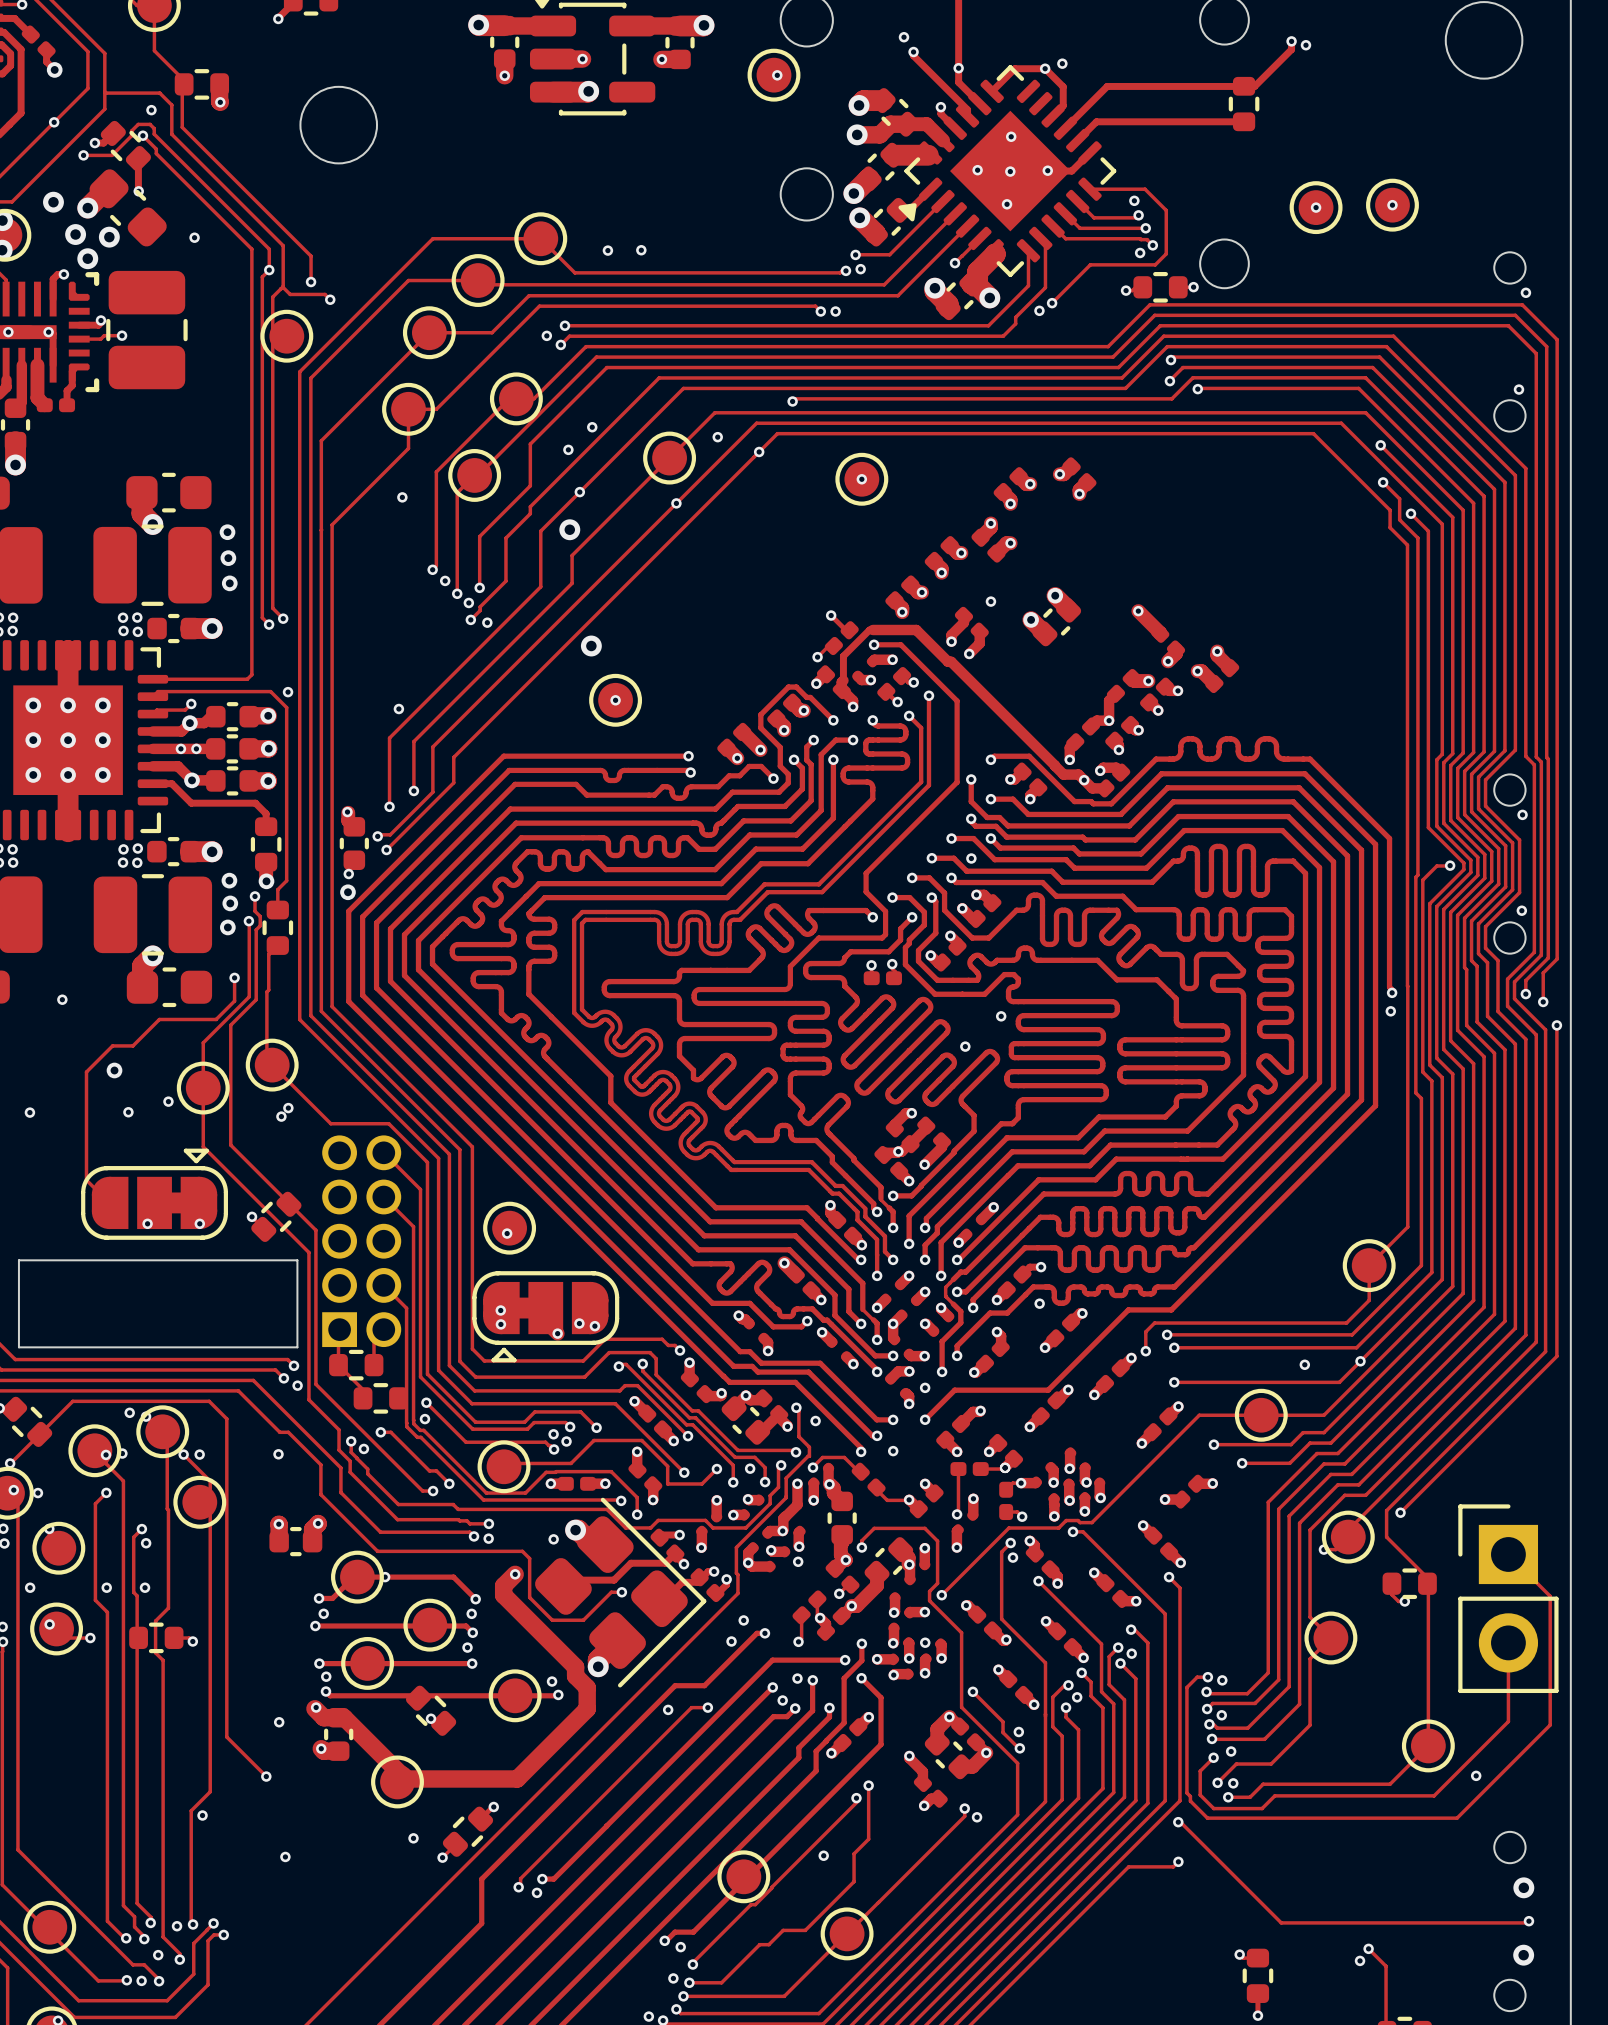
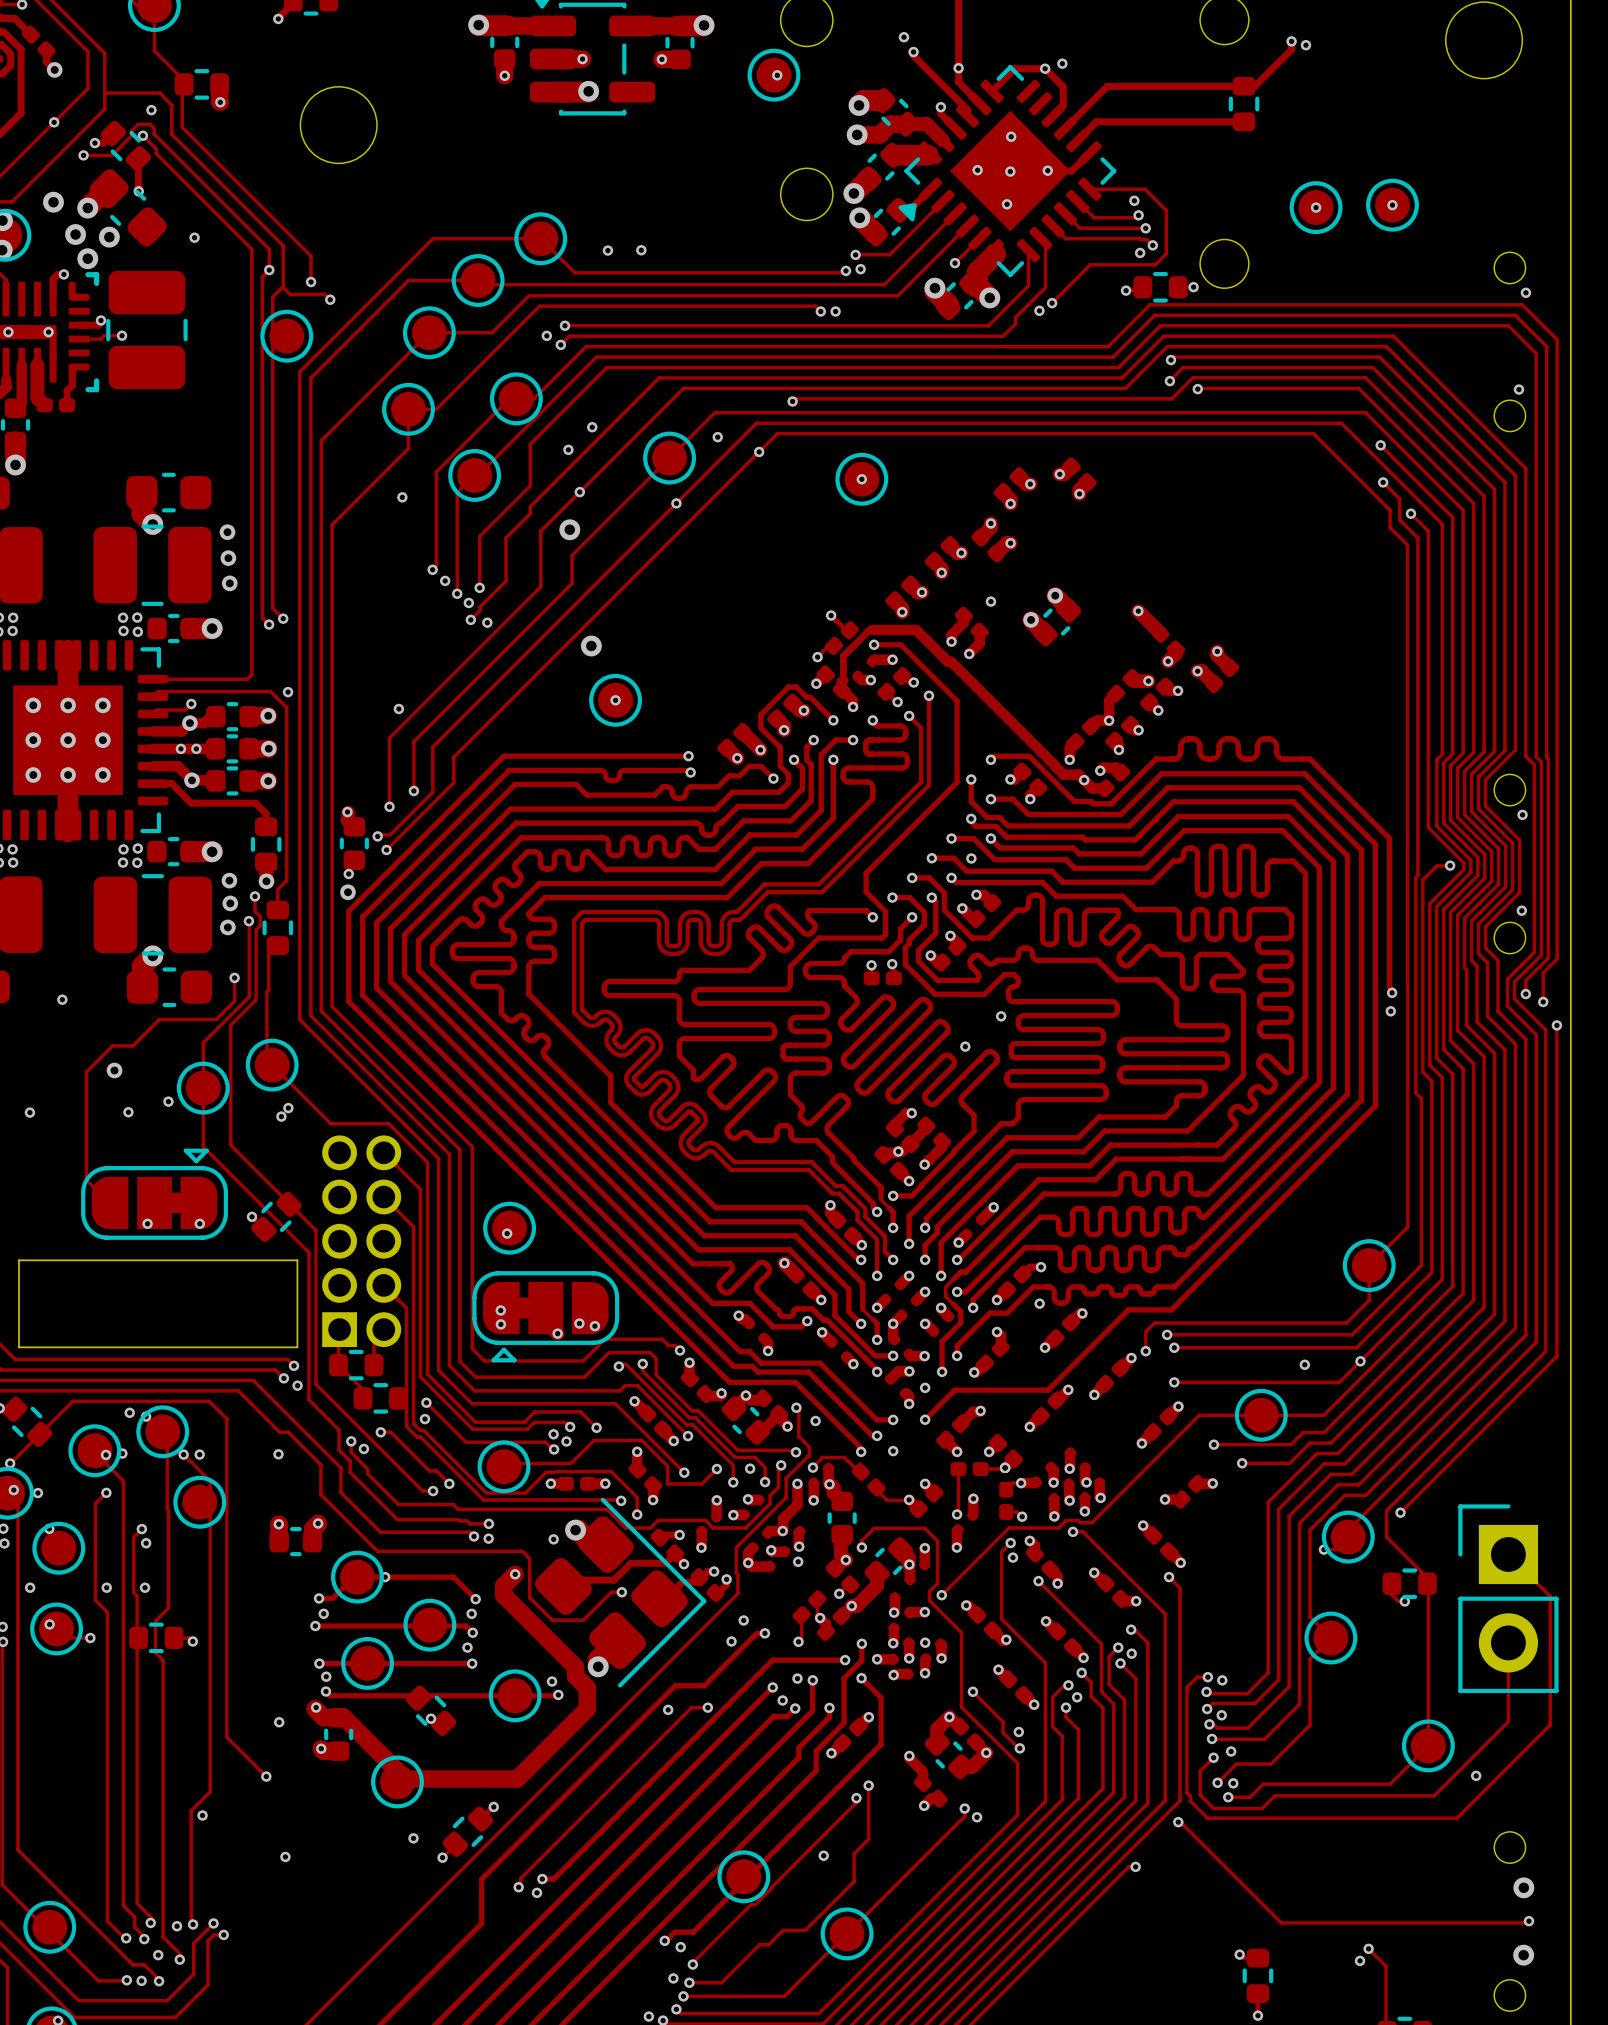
track: (1178, 1861) (1173, 1866) (1135, 1866) -> none
via position: (1178, 1861) -> (1135, 1866)

